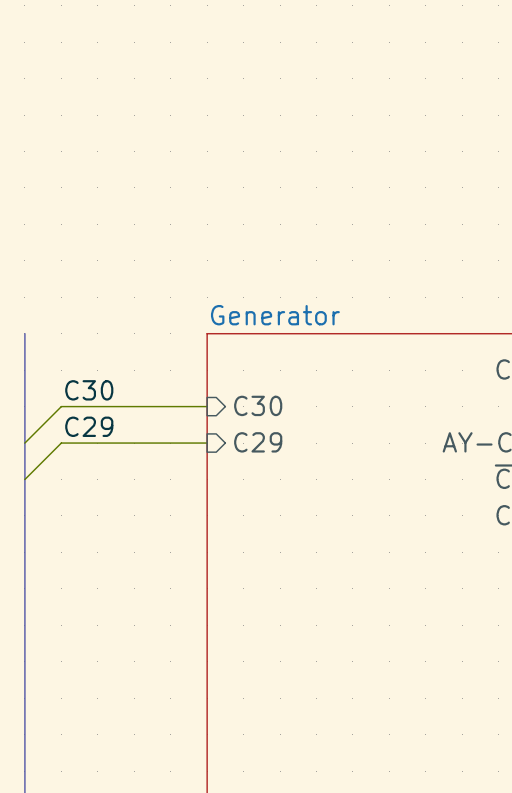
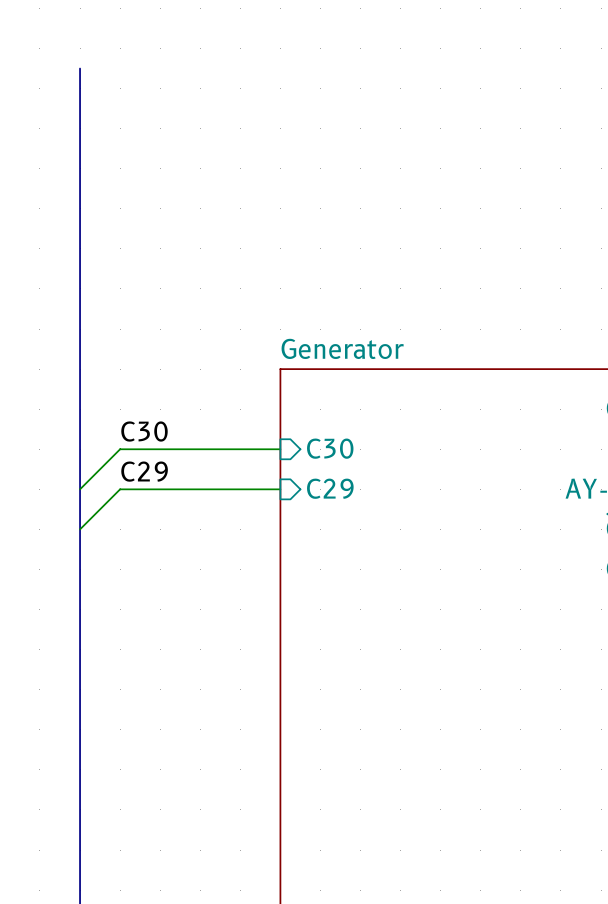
bus: none -> (80, 68) (80, 369)

